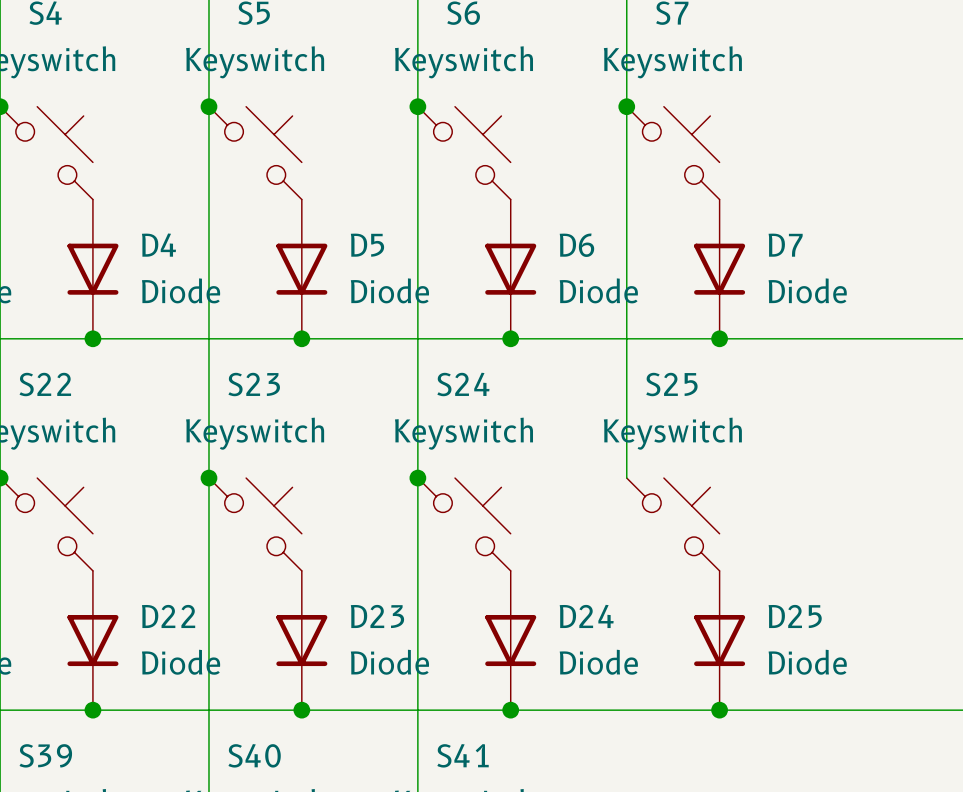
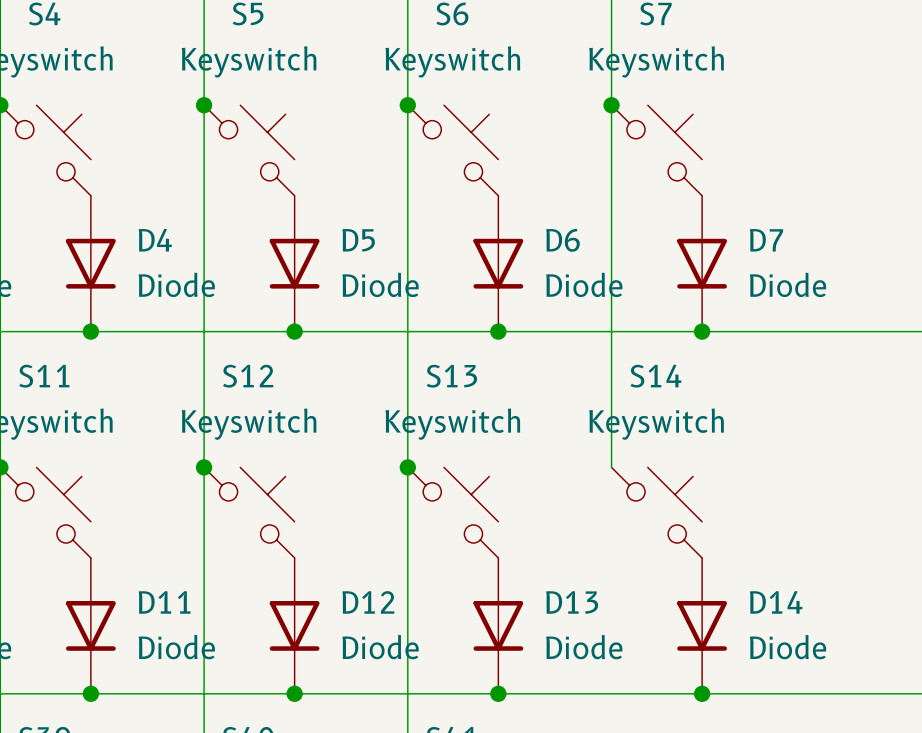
S22 name: S22 (45, 384) -> S11 (44, 376)
S23 name: S23 (254, 384) -> S12 (248, 376)
S24 name: S24 (463, 384) -> S13 (451, 376)
S25 name: S25 (671, 384) -> S14 (655, 376)
D22 name: D22 (168, 616) -> D11 (164, 602)
D23 name: D23 (377, 616) -> D12 (368, 602)
D24 name: D24 (586, 616) -> D13 (572, 602)
D25 name: D25 (795, 616) -> D14 (776, 602)

